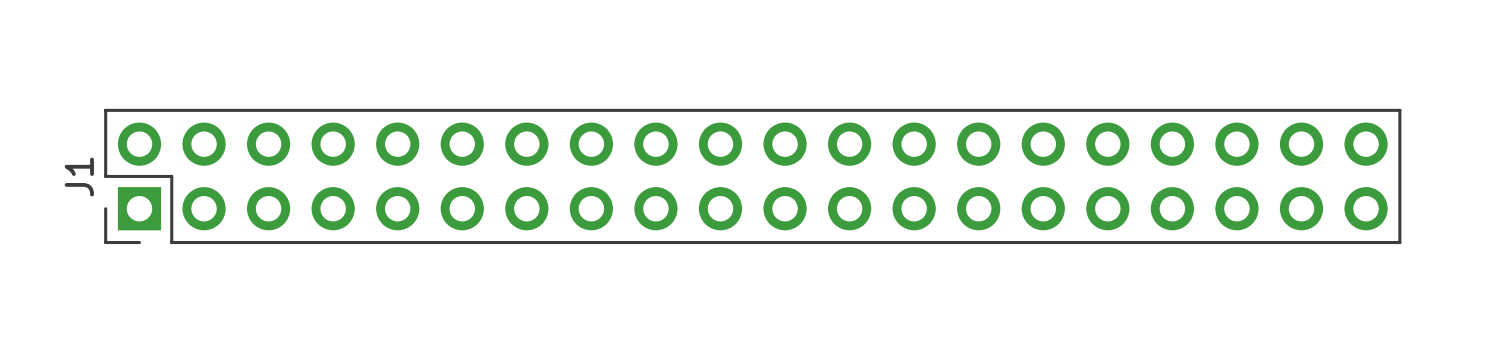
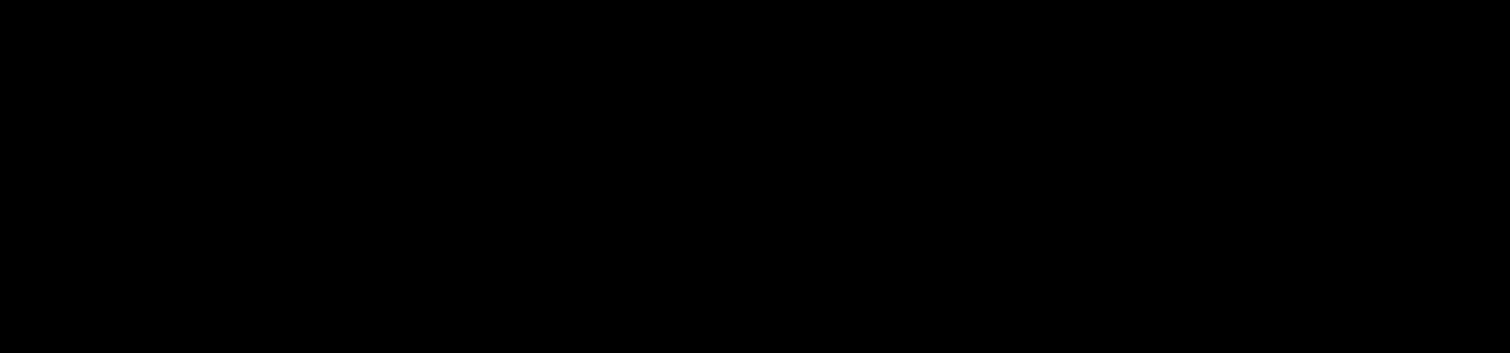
J1: (752, 176) -> none

